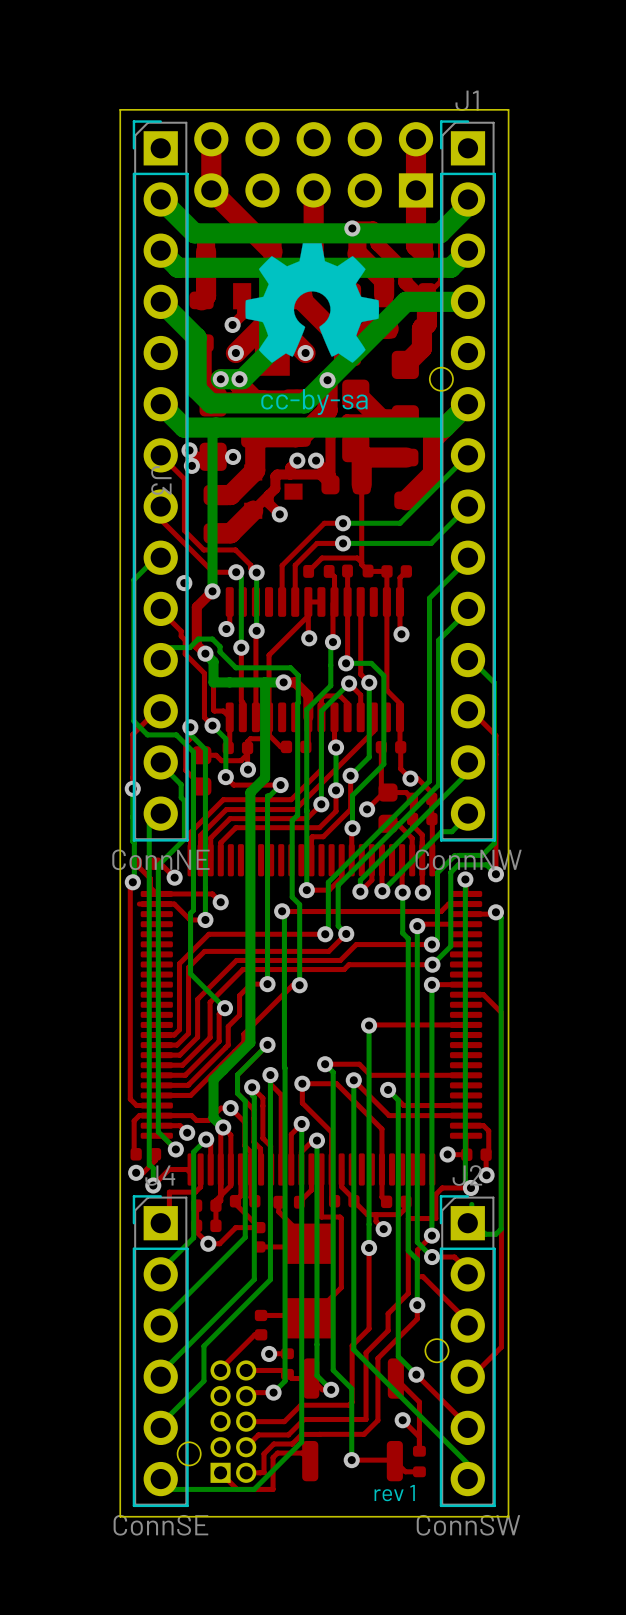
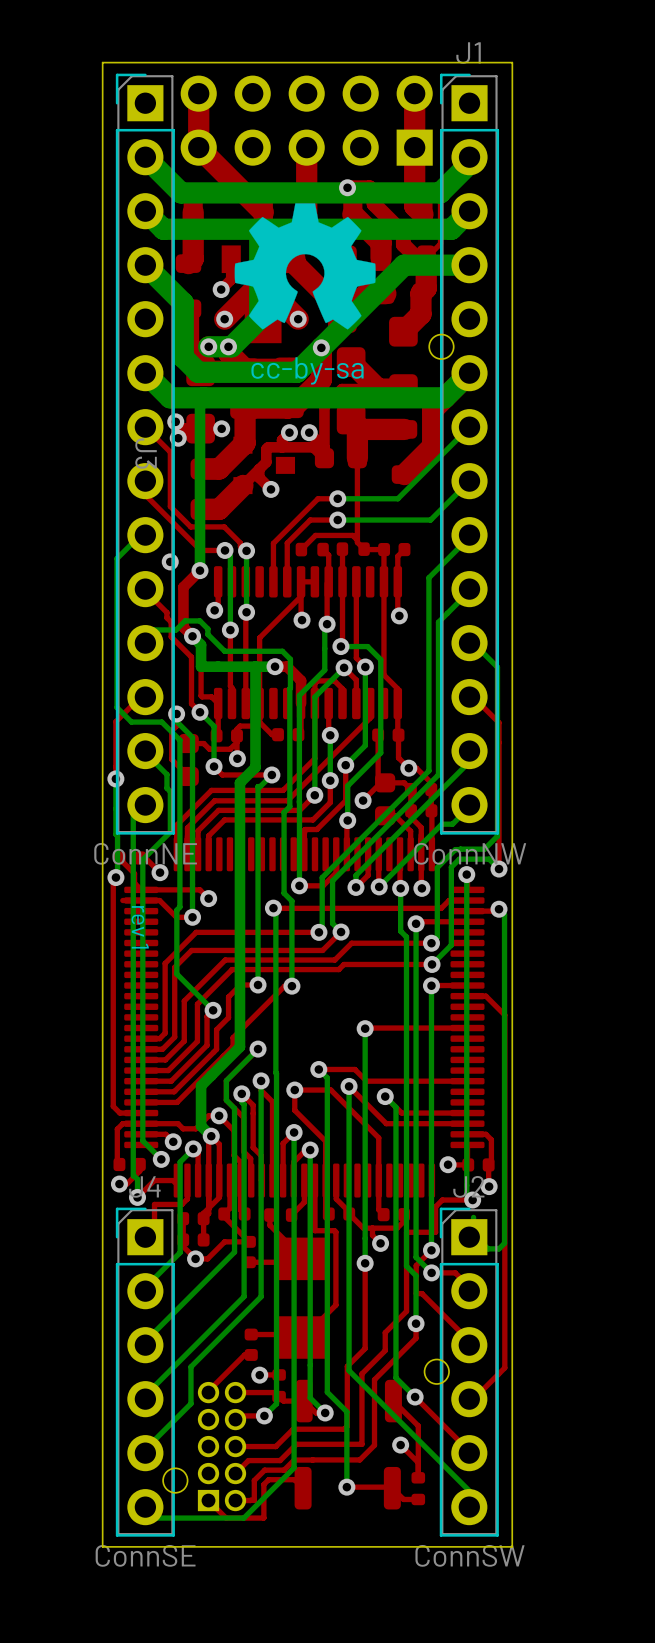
text: none -> rev 1 (140, 927)
text: rev 1 (394, 1493) -> none

